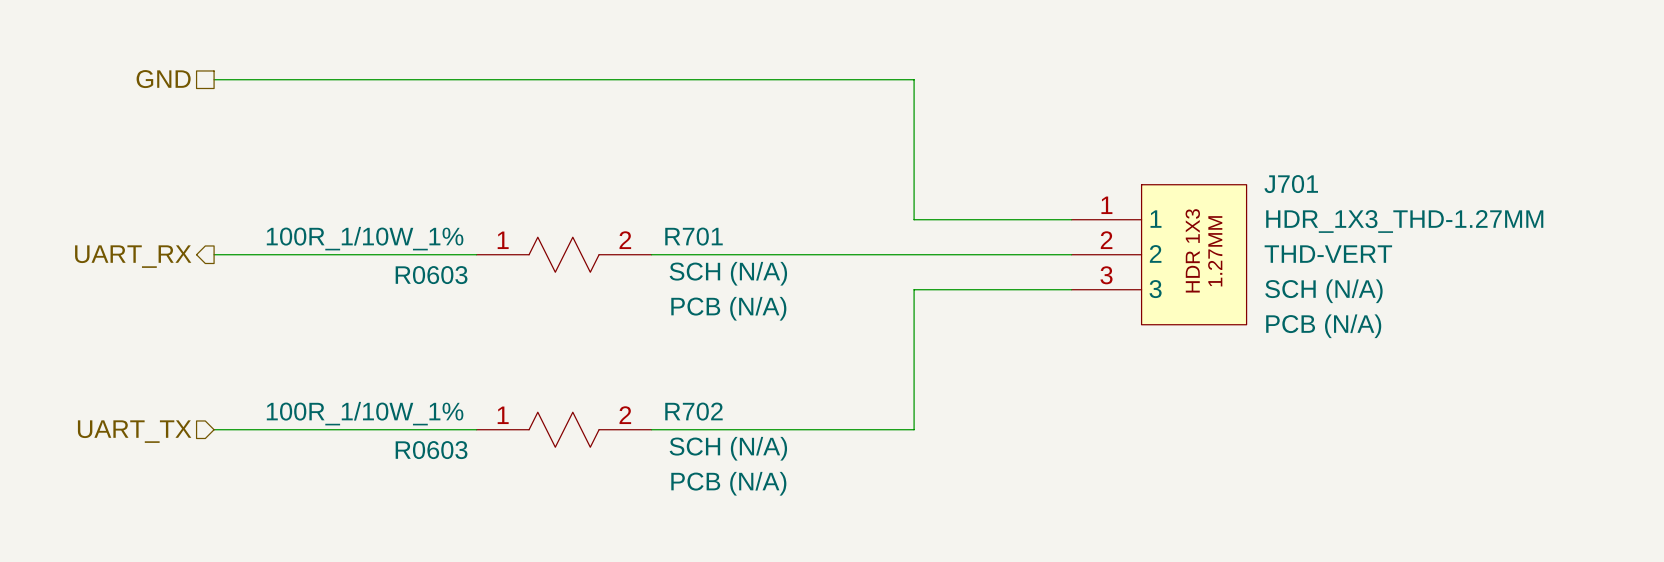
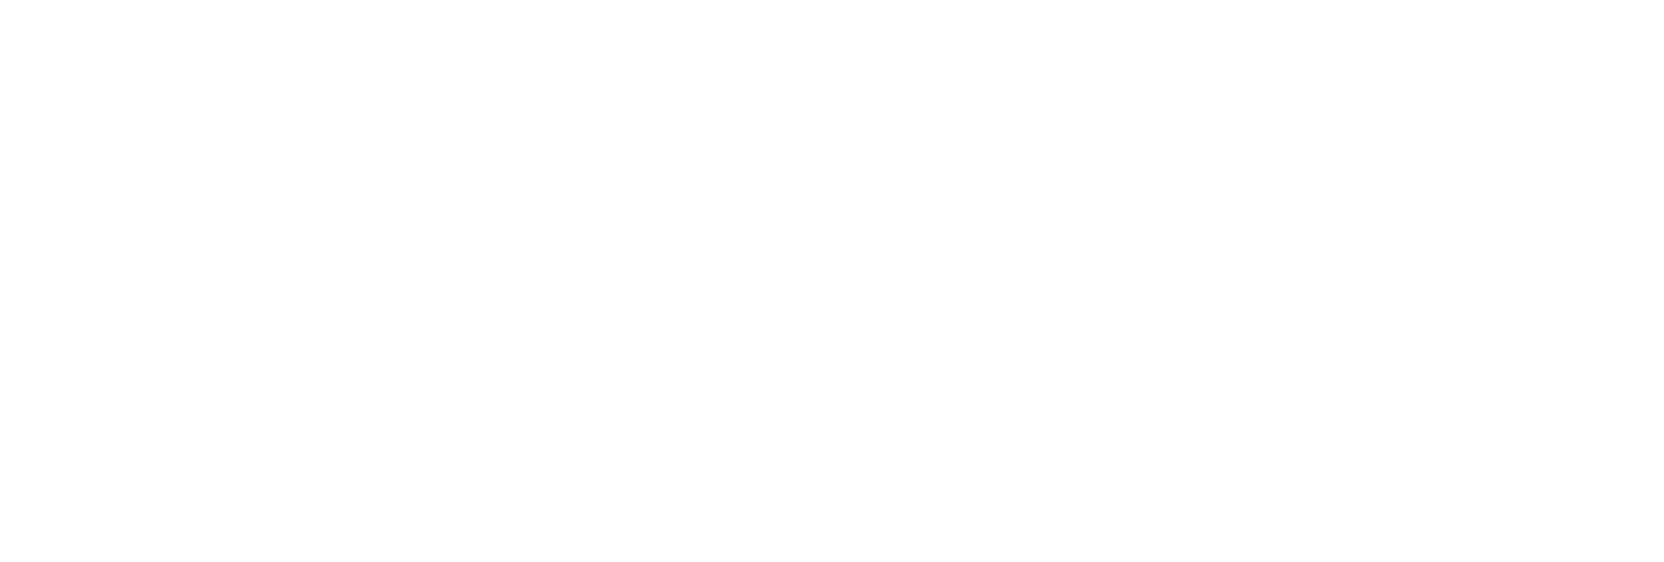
hierarchical label: GND (163, 79) -> none
wire: (214, 79) (914, 79) (914, 219) (1071, 219) -> none
wire: (214, 254) (476, 254) -> none
R701: 100R_1/10W_1% (564, 254) -> none
wire: (651, 254) (1071, 254) -> none
J701: HDR_1X3_THD-1.27MM (1159, 254) -> none
hierarchical label: UART_RX (133, 256) -> none
wire: (1071, 289) (914, 289) (914, 429) (651, 429) -> none
wire: (214, 429) (476, 429) -> none
R702: 100R_1/10W_1% (564, 429) -> none
hierarchical label: UART_TX (134, 431) -> none

